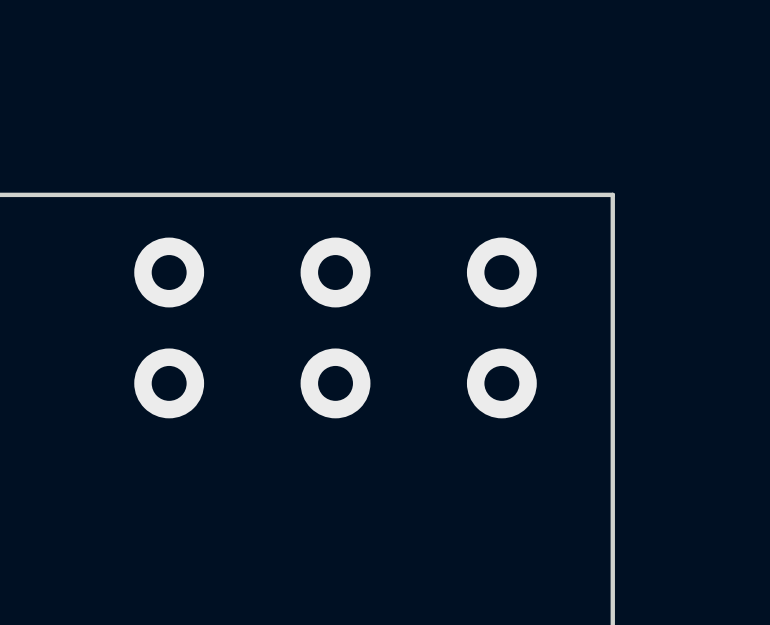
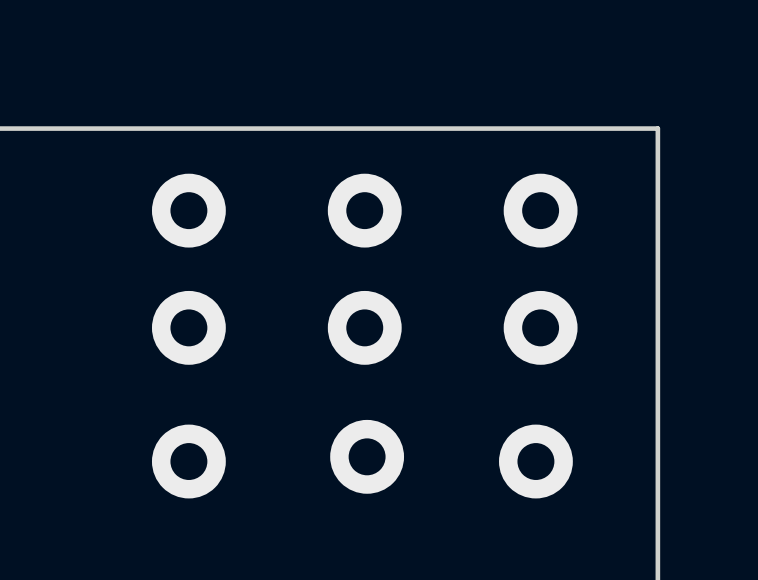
via: none -> (367, 456)
via: none -> (188, 461)
via: none -> (535, 461)

